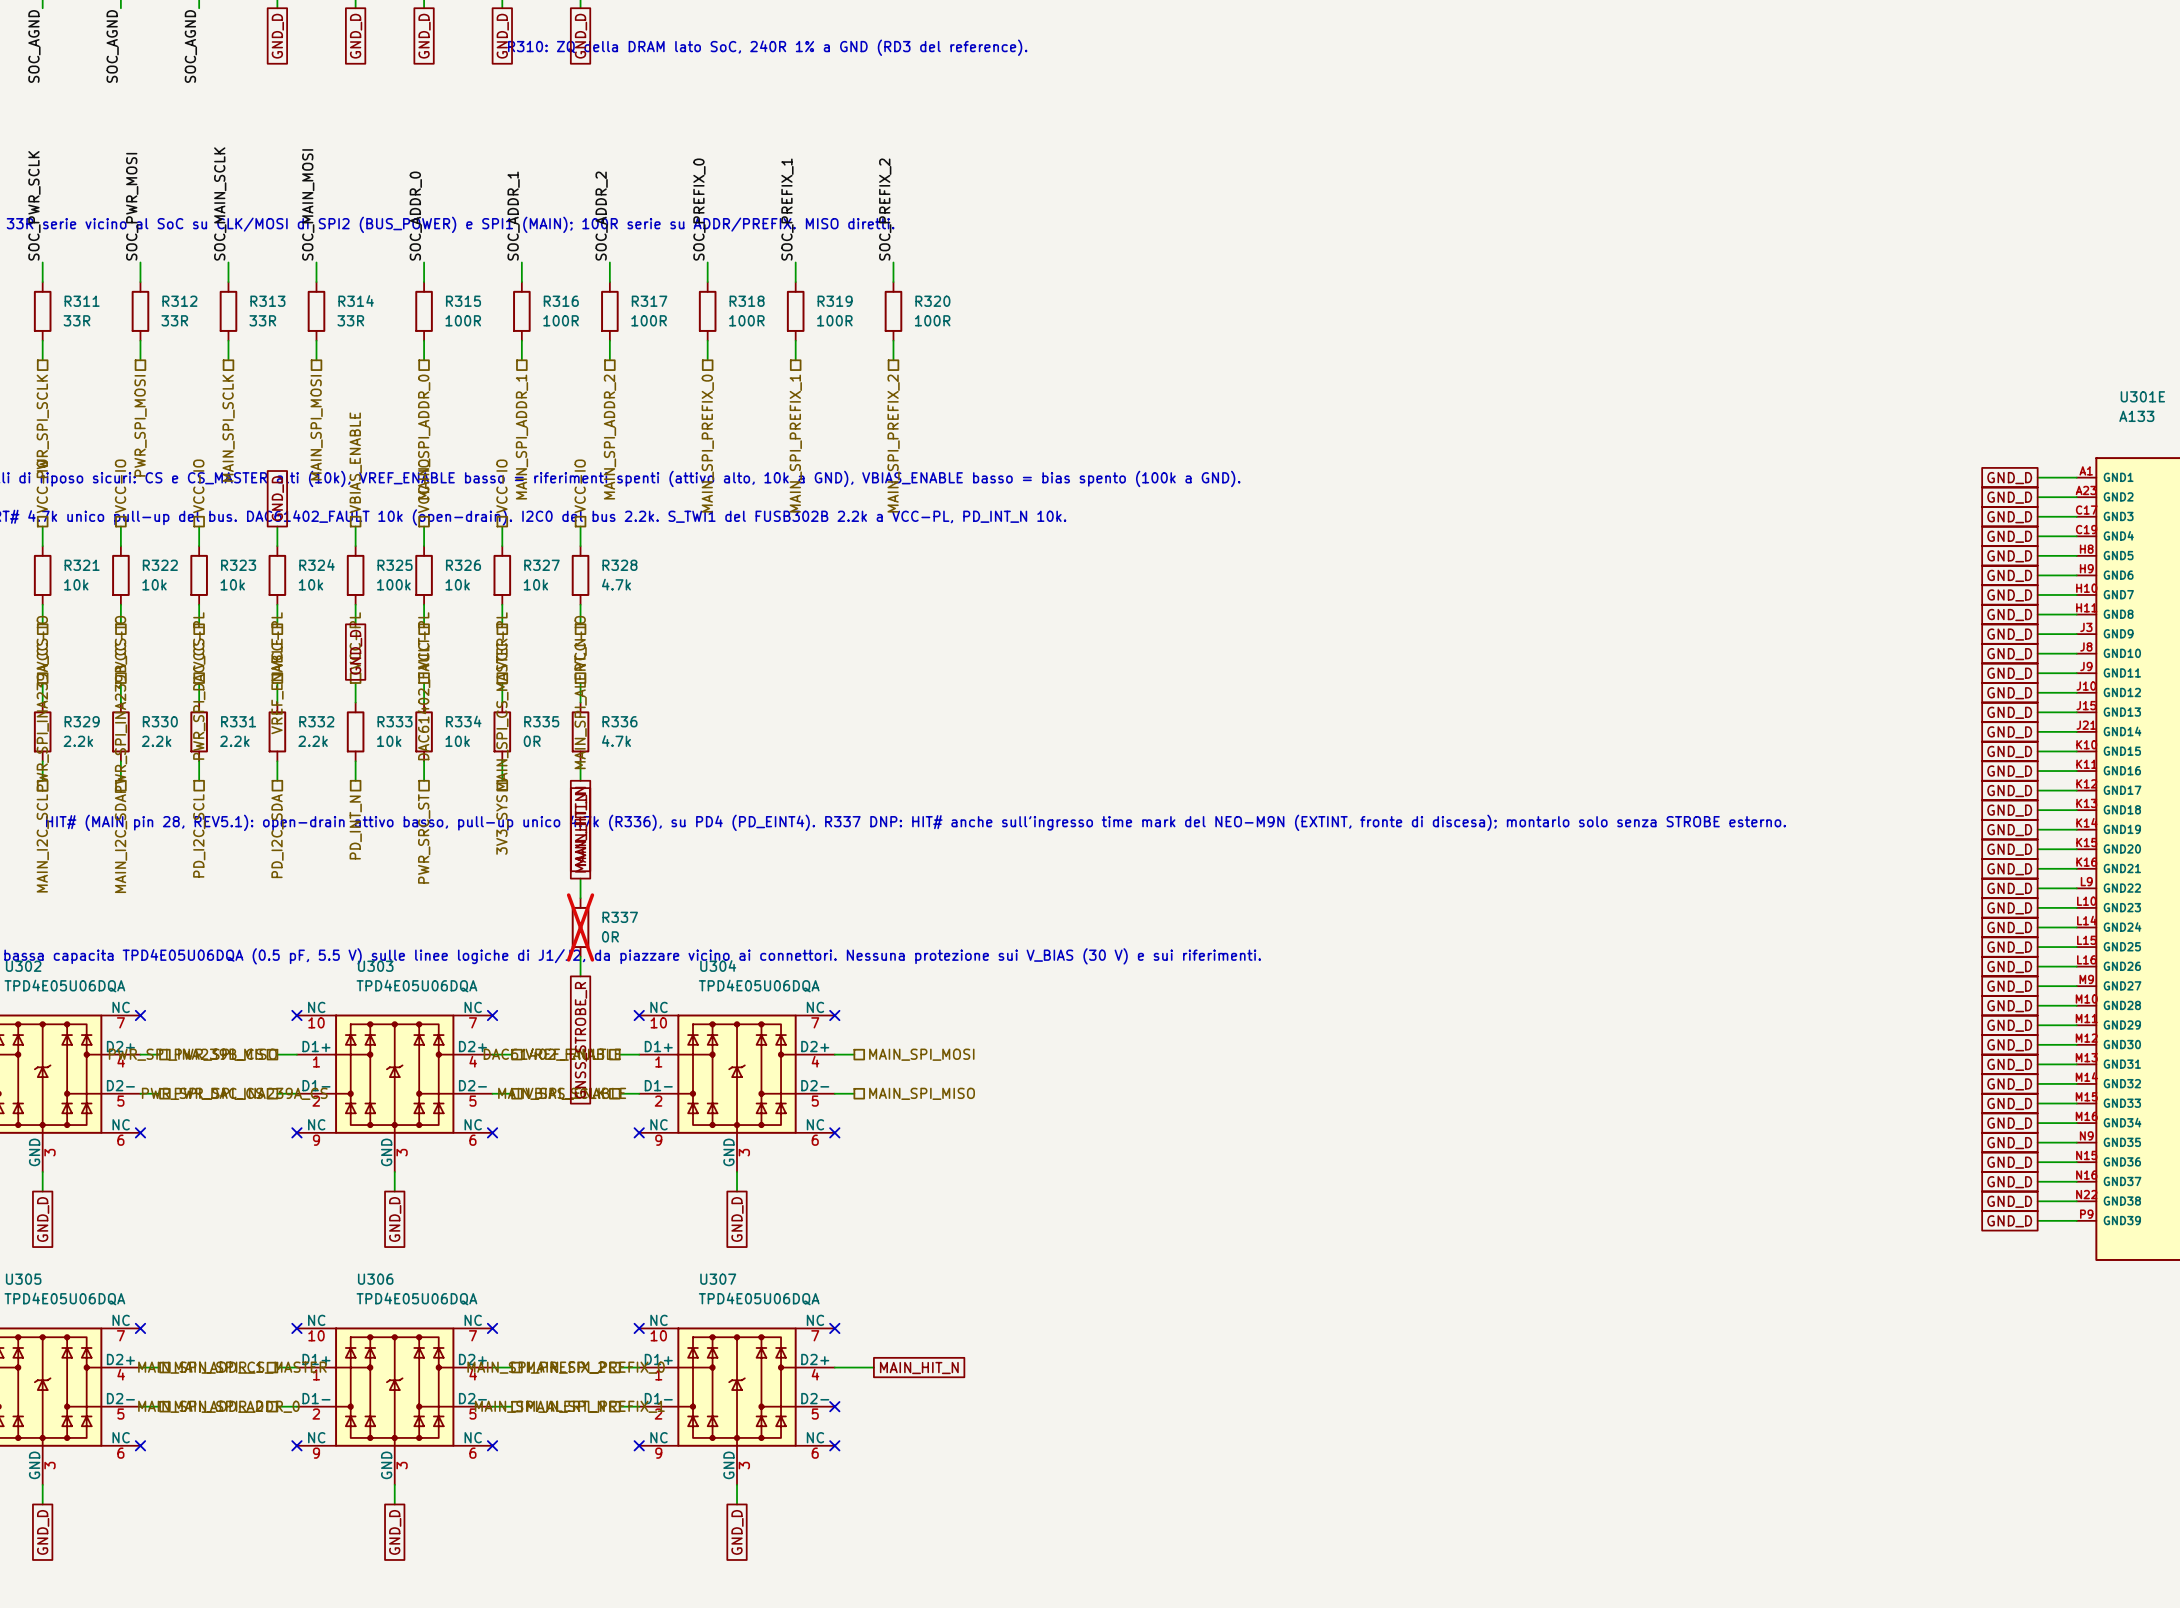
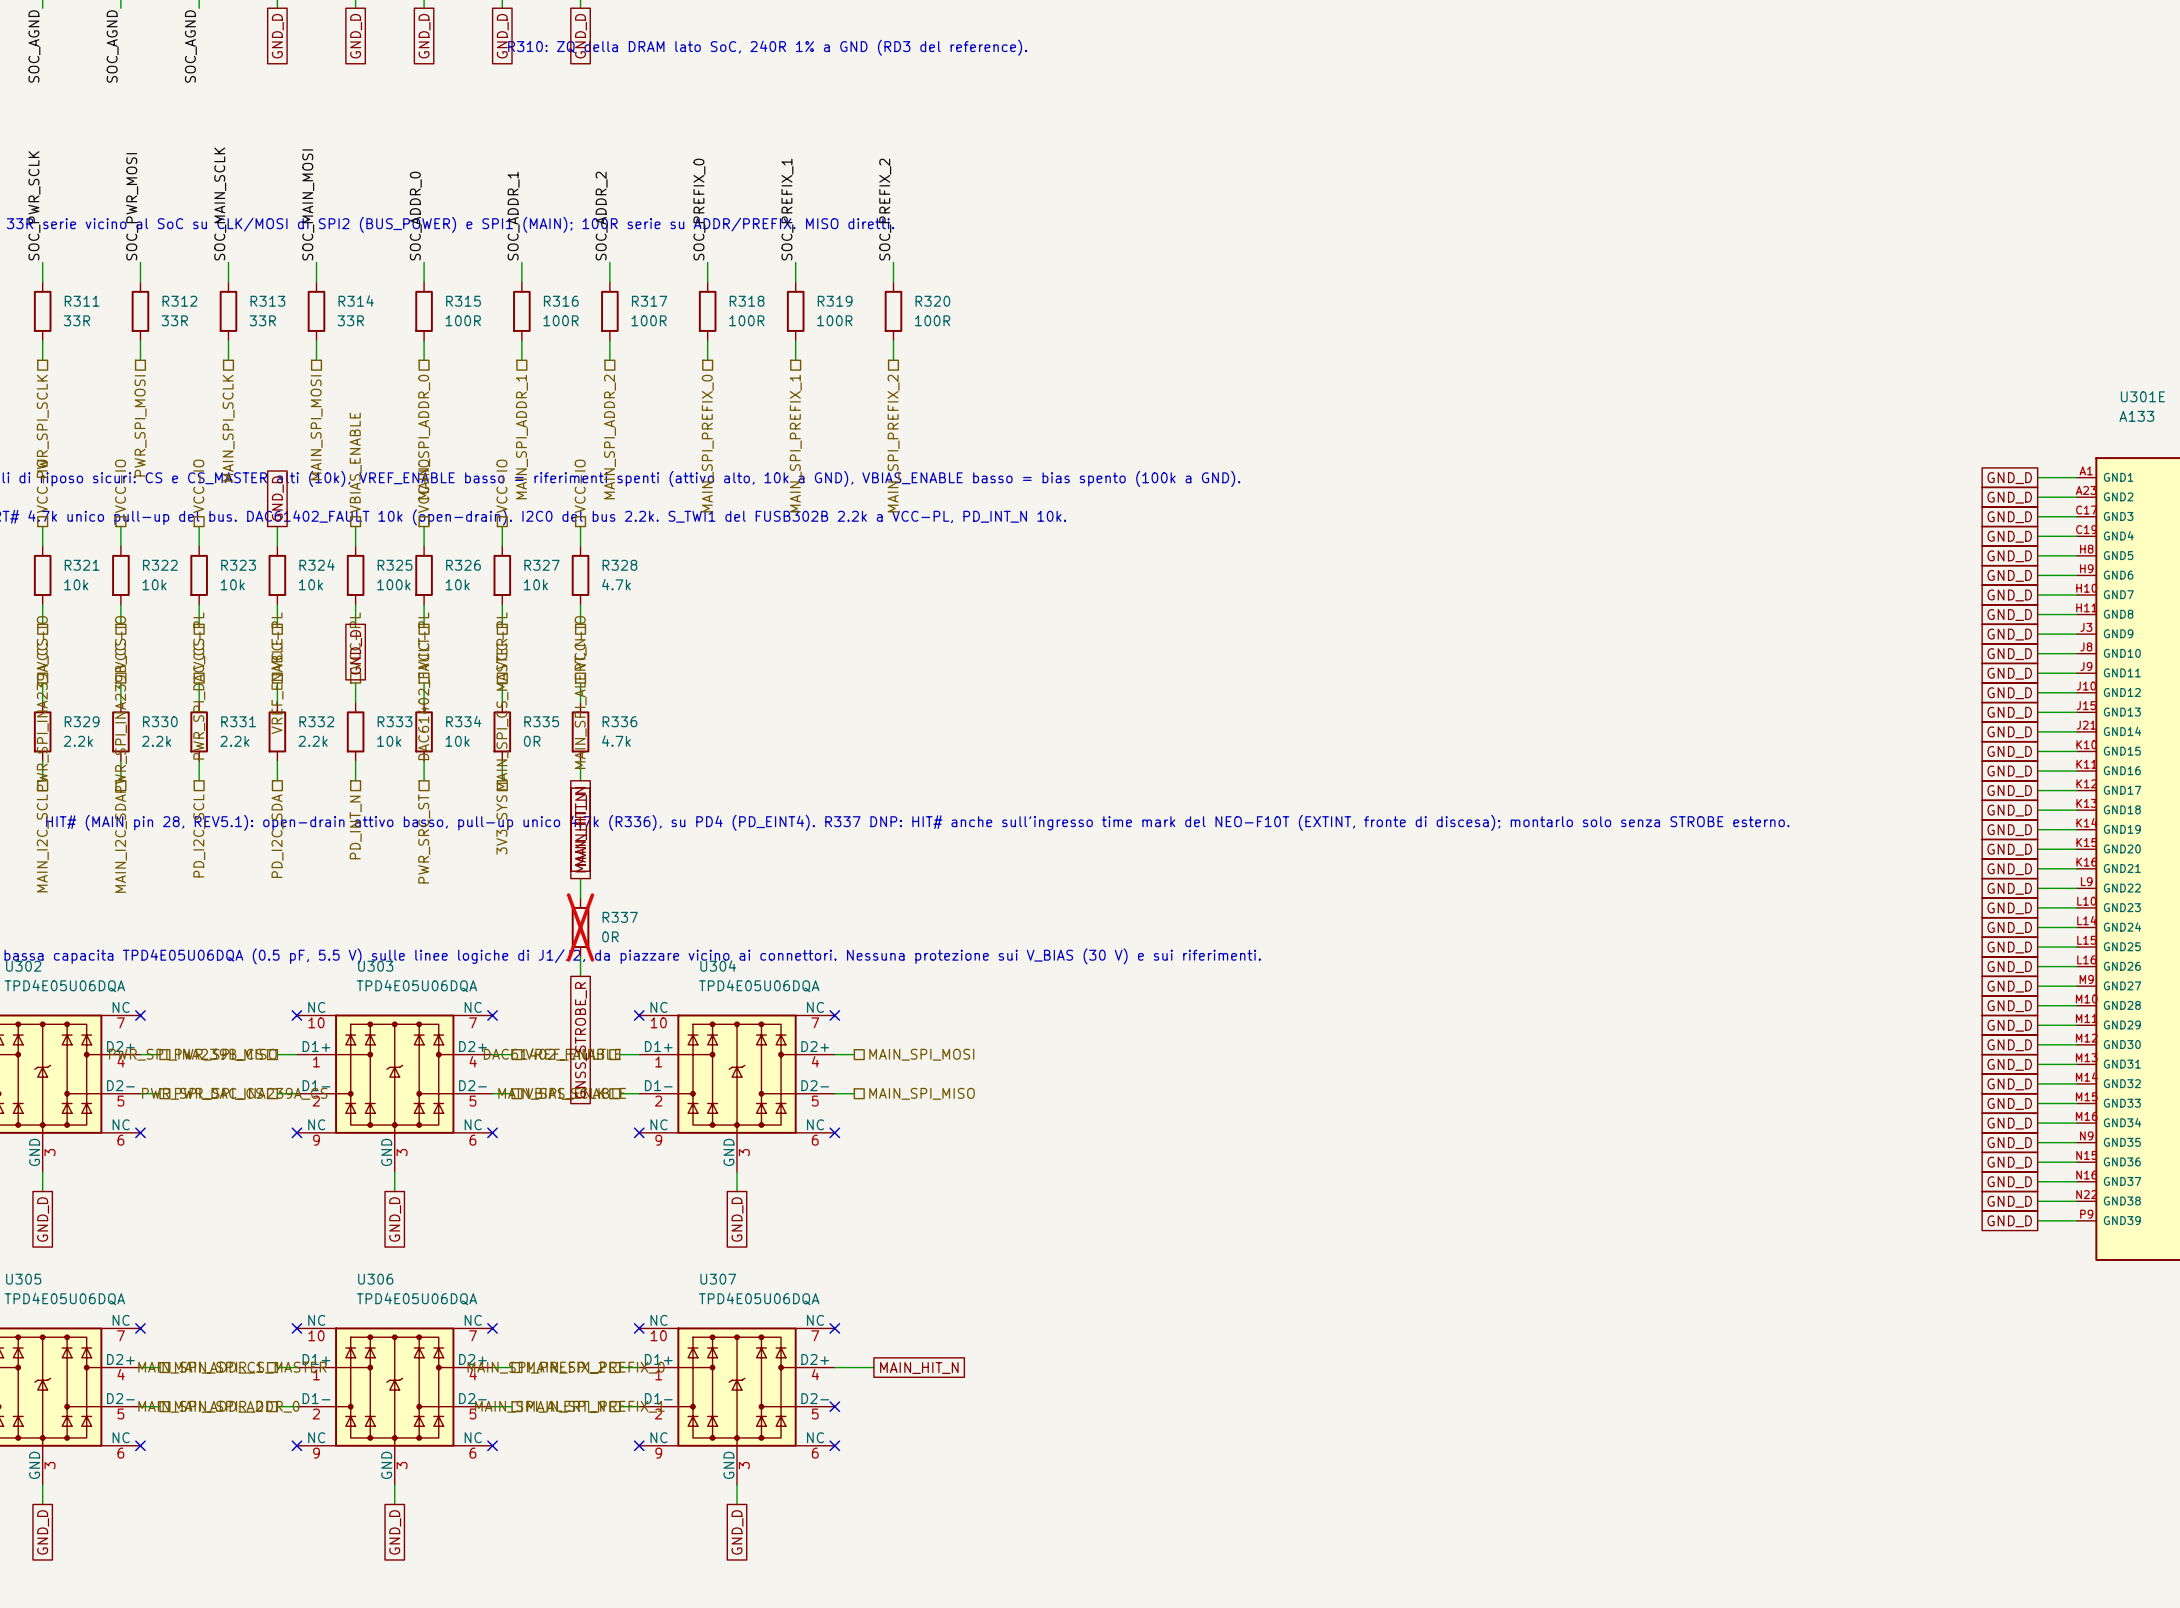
text: HIT# (MAIN pin 28, REV5.1): open-drain attivo basso, pull-up unico 4.7k (R336), su PD4 (PD_EINT4). R337 DNP: HIT# anche sull'ingresso time mark del NEO-M9N (EXTINT, fronte di discesa); montarlo solo senza STROBE esterno. (915, 822) -> HIT# (MAIN pin 28, REV5.1): open-drain attivo basso, pull-up unico 4.7k (R336), su PD4 (PD_EINT4). R337 DNP: HIT# anche sull'ingresso time mark del NEO-F10T (EXTINT, fronte di discesa); montarlo solo senza STROBE esterno. (917, 822)

